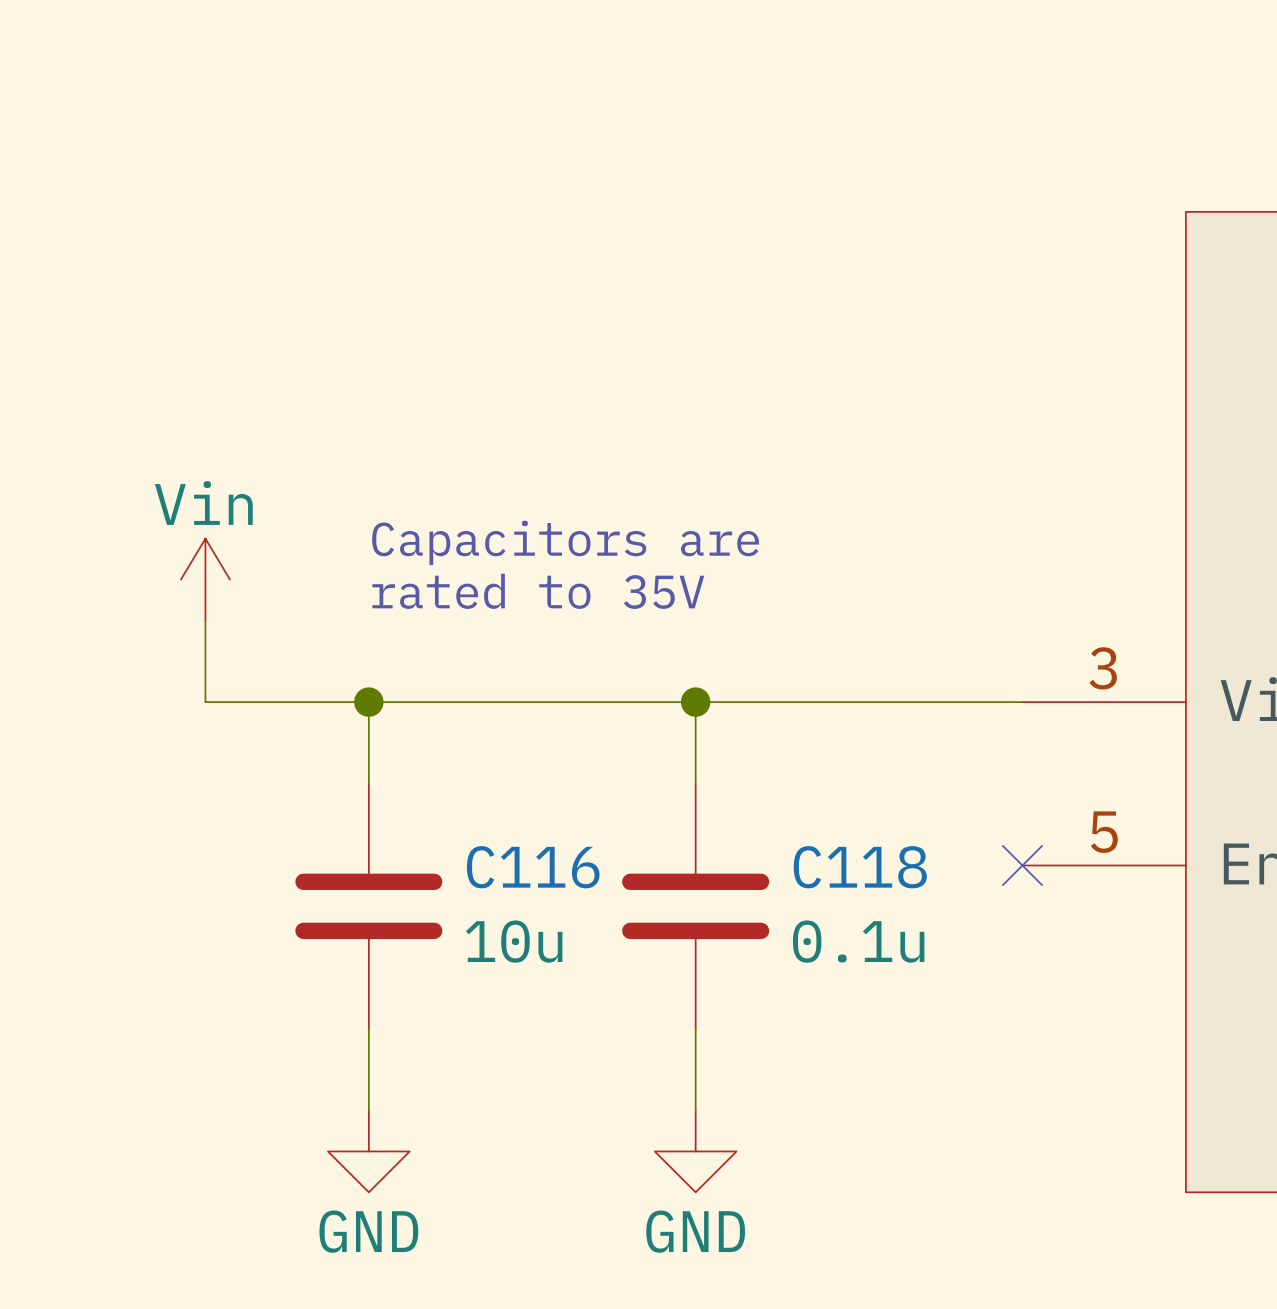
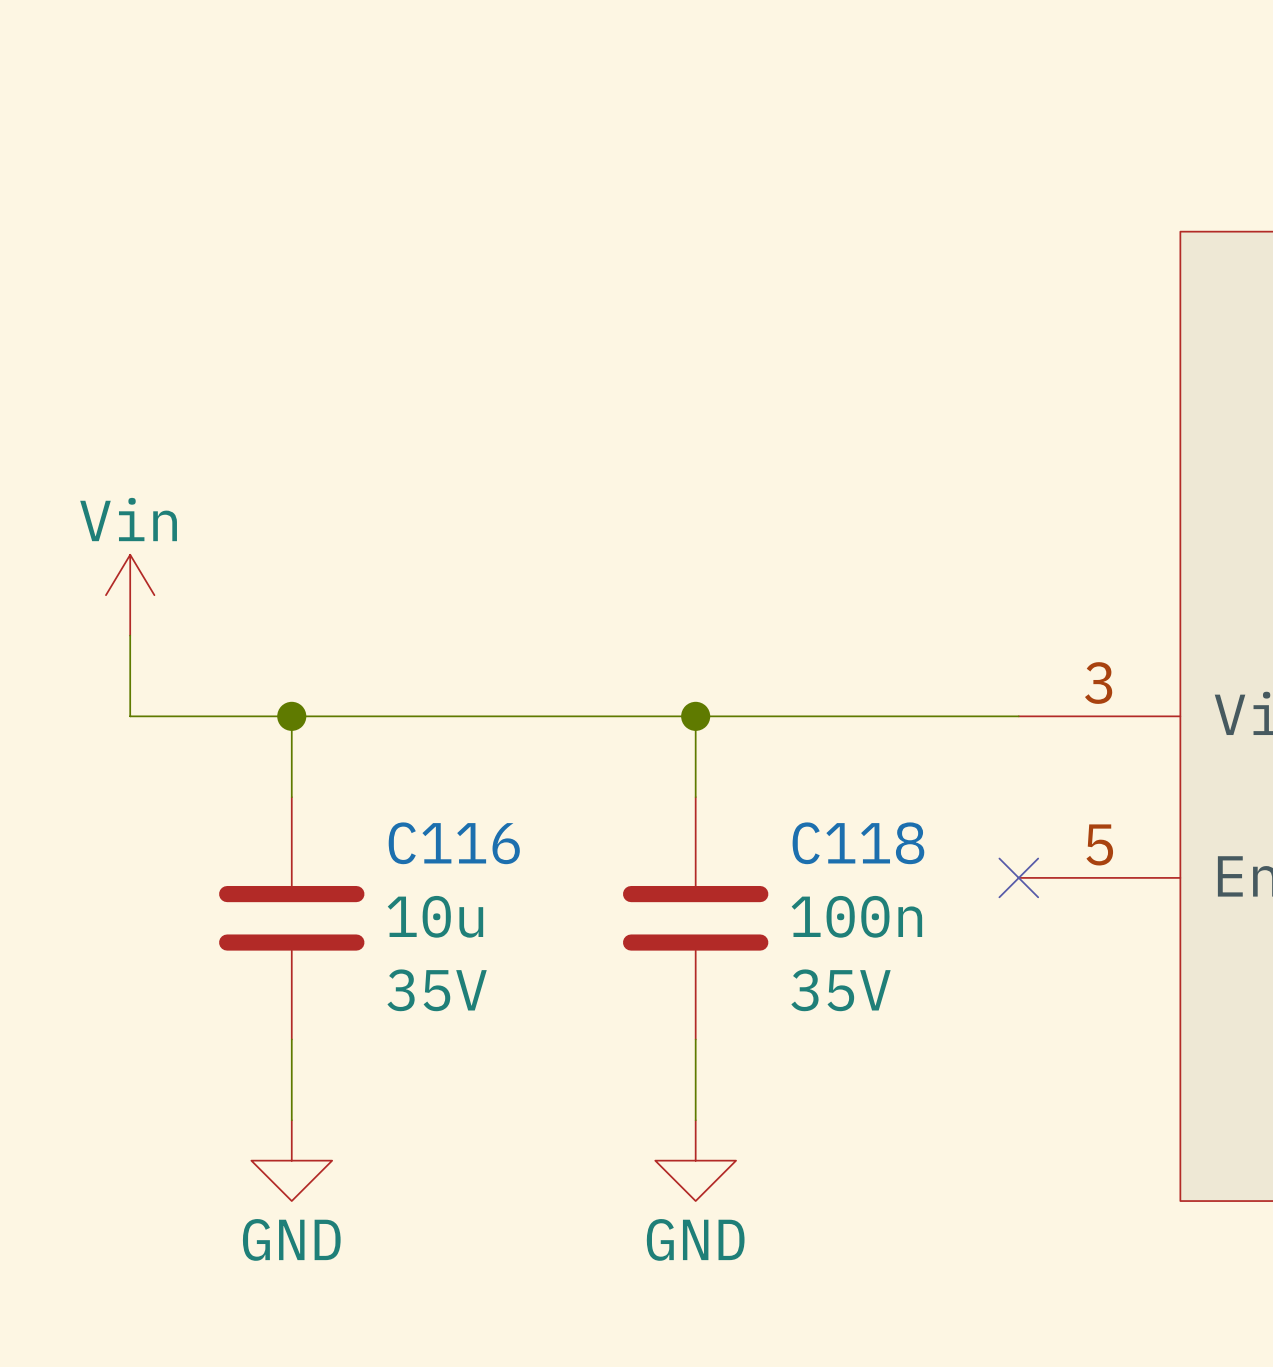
text: Capacitors are (565, 542) -> none
power symbol position: Vin (205, 579) -> Vin (130, 595)
text: rated to 35V (538, 591) -> none
wire: (205, 620) (205, 702) -> (130, 635) (130, 716) (210, 716)
wire: (368, 702) (368, 783) -> (291, 716) (291, 797)
junction position: (368, 702) -> (291, 716)
C116 name position: C116 (533, 867) -> C116 (454, 843)
C118 name position: C118 (860, 867) -> C118 (858, 843)
C116 position: (368, 906) -> (291, 918)
C116 value position: 10u (514, 941) -> 10u (435, 916)
C118 value: 0.1u (858, 941) -> 100n (856, 916)
C116 text: none -> 35V (437, 990)
C118 text: none -> 35V (841, 990)
wire: (368, 1028) (368, 1110) -> (291, 1039) (291, 1120)
power symbol position: GND (368, 1151) -> GND (291, 1160)

